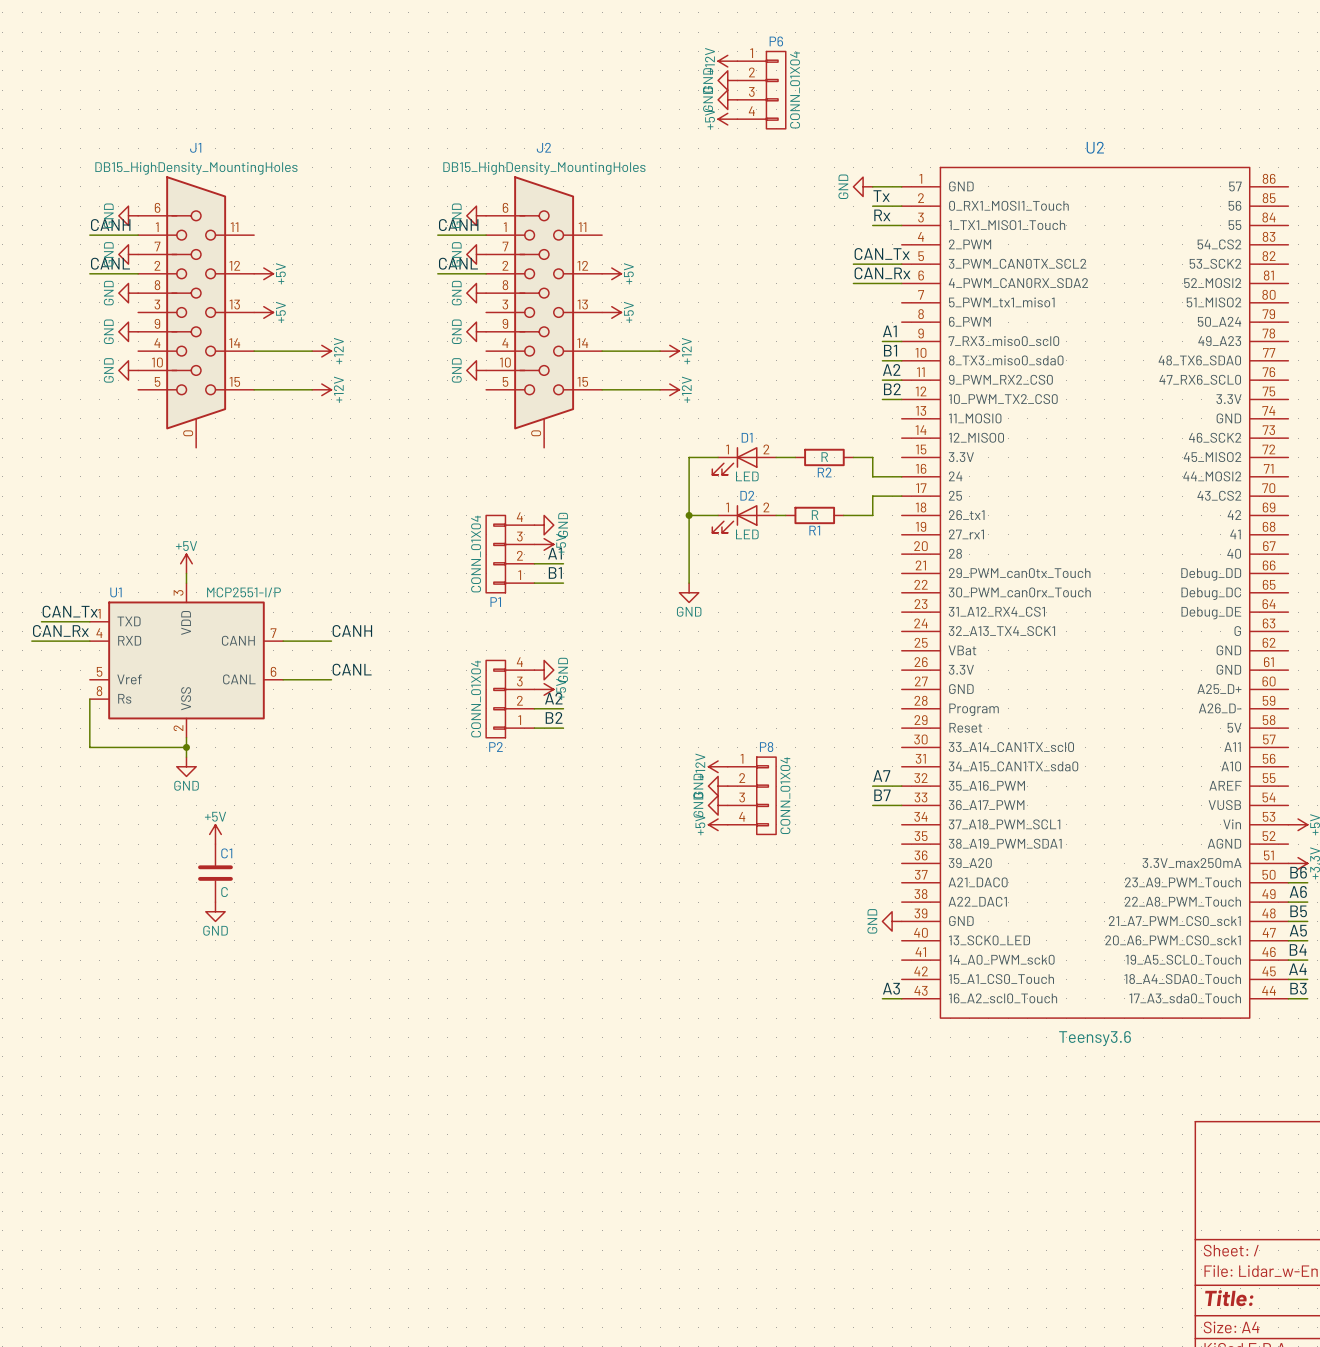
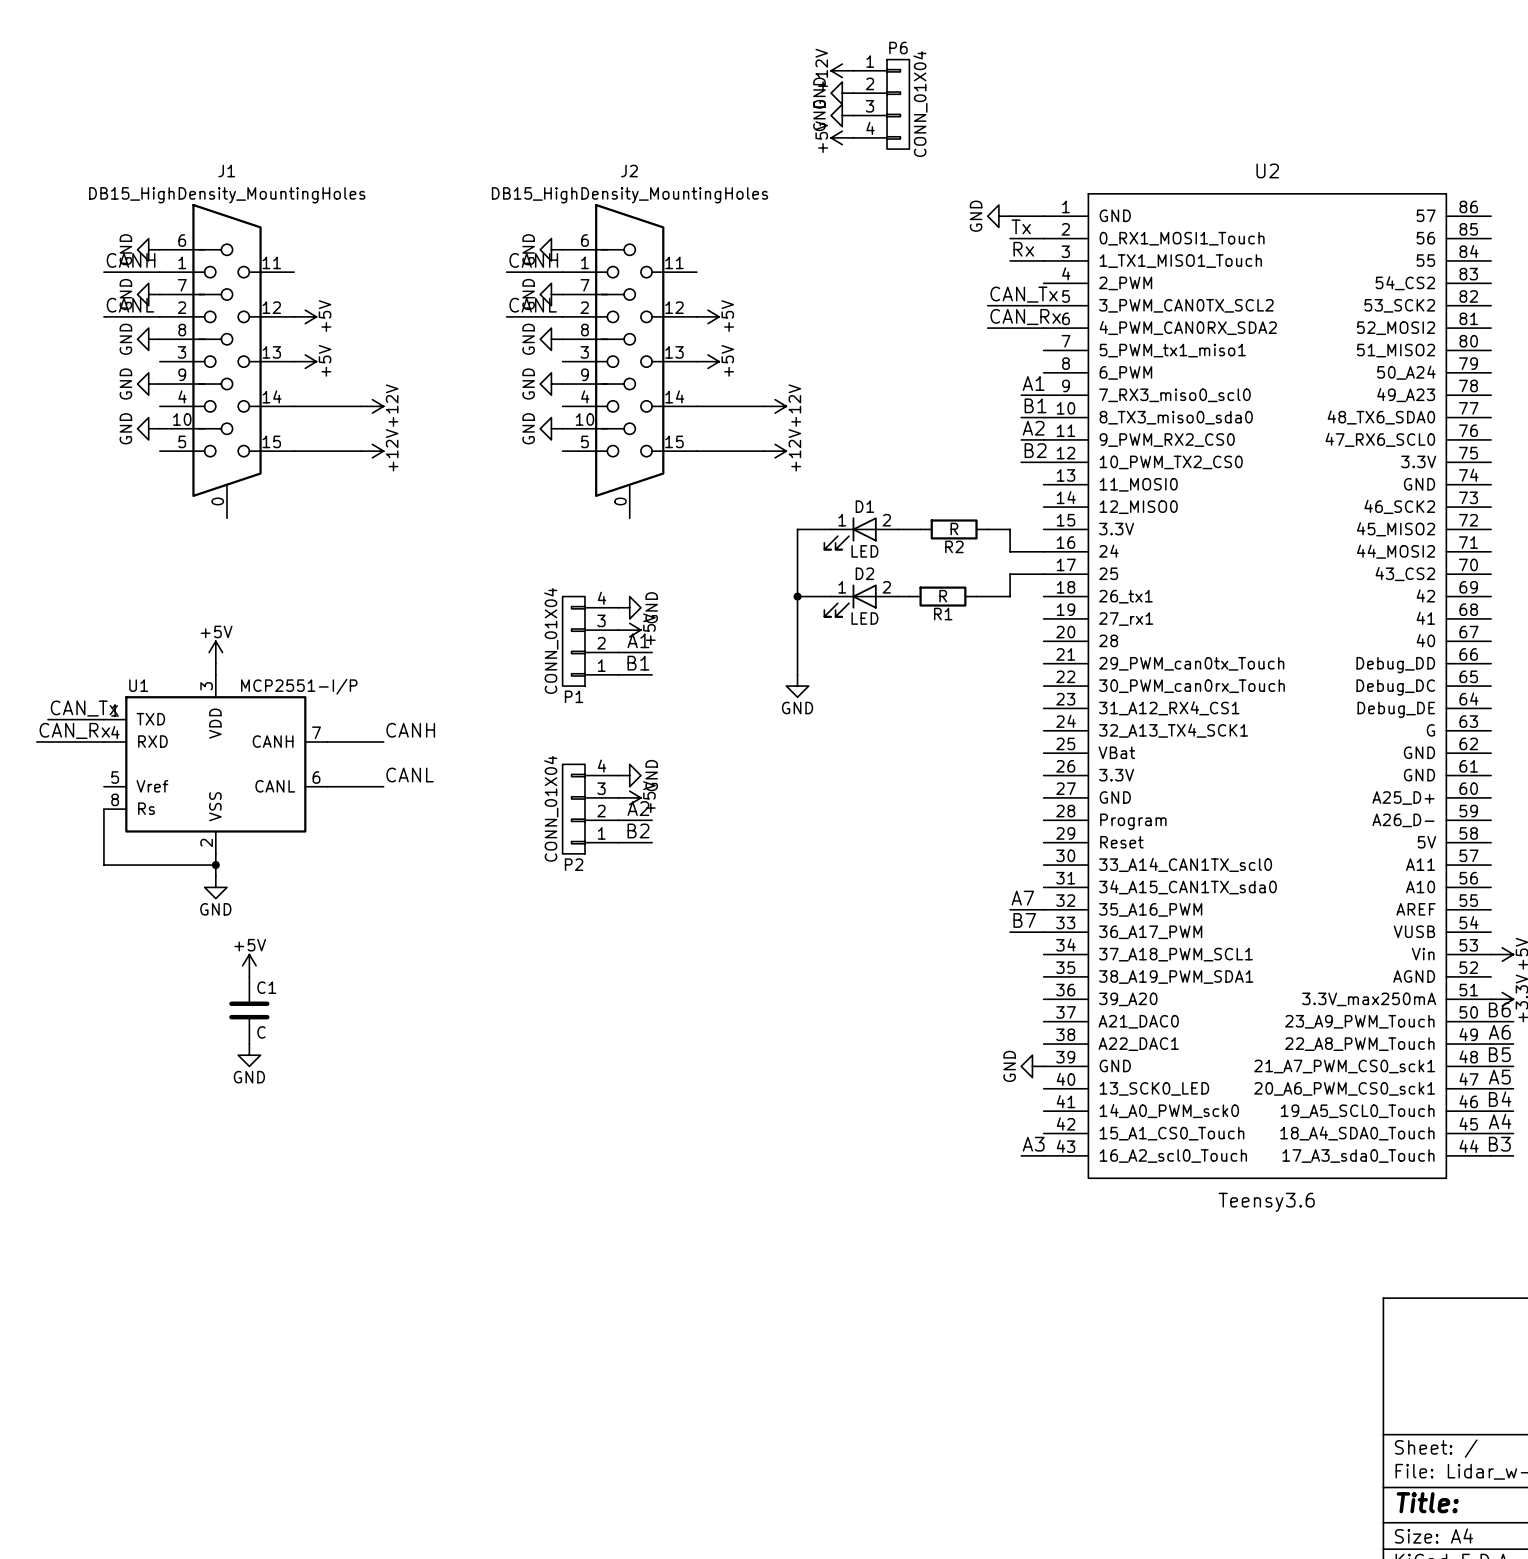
power symbol: +12V (718, 766) -> none
power symbol: GND (718, 786) -> none
P8: CONN_01X04 (751, 795) -> none
power symbol: GND (718, 805) -> none
power symbol: +5V (718, 824) -> none

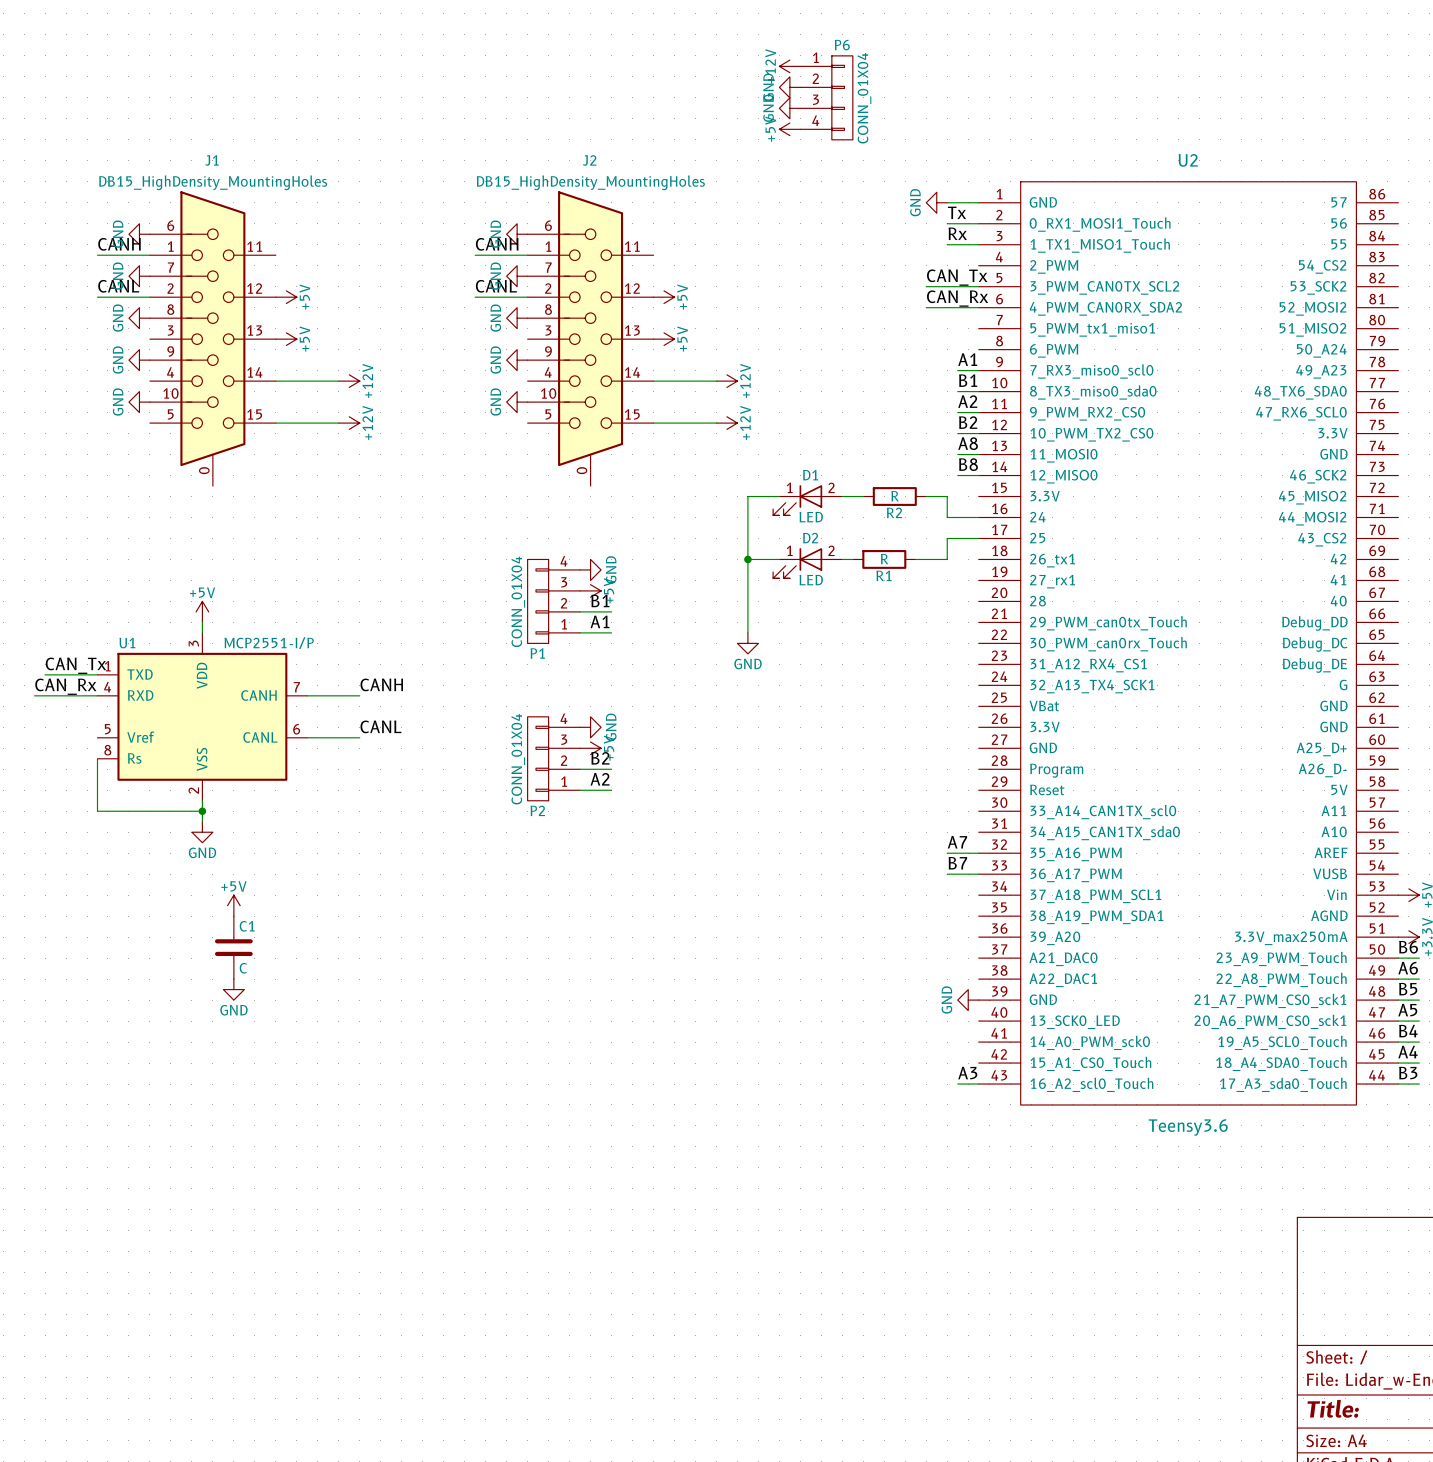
label: none -> A8 (968, 443)
wire: none -> (957, 454) (978, 454)
label: none -> B8 (968, 464)
wire: none -> (957, 475) (978, 475)
label: A1 (638, 640) -> B1 (600, 600)
label: B1 (638, 663) -> A1 (600, 621)
label: A2 (638, 808) -> B2 (600, 758)
label: B2 (638, 830) -> A2 (600, 779)

